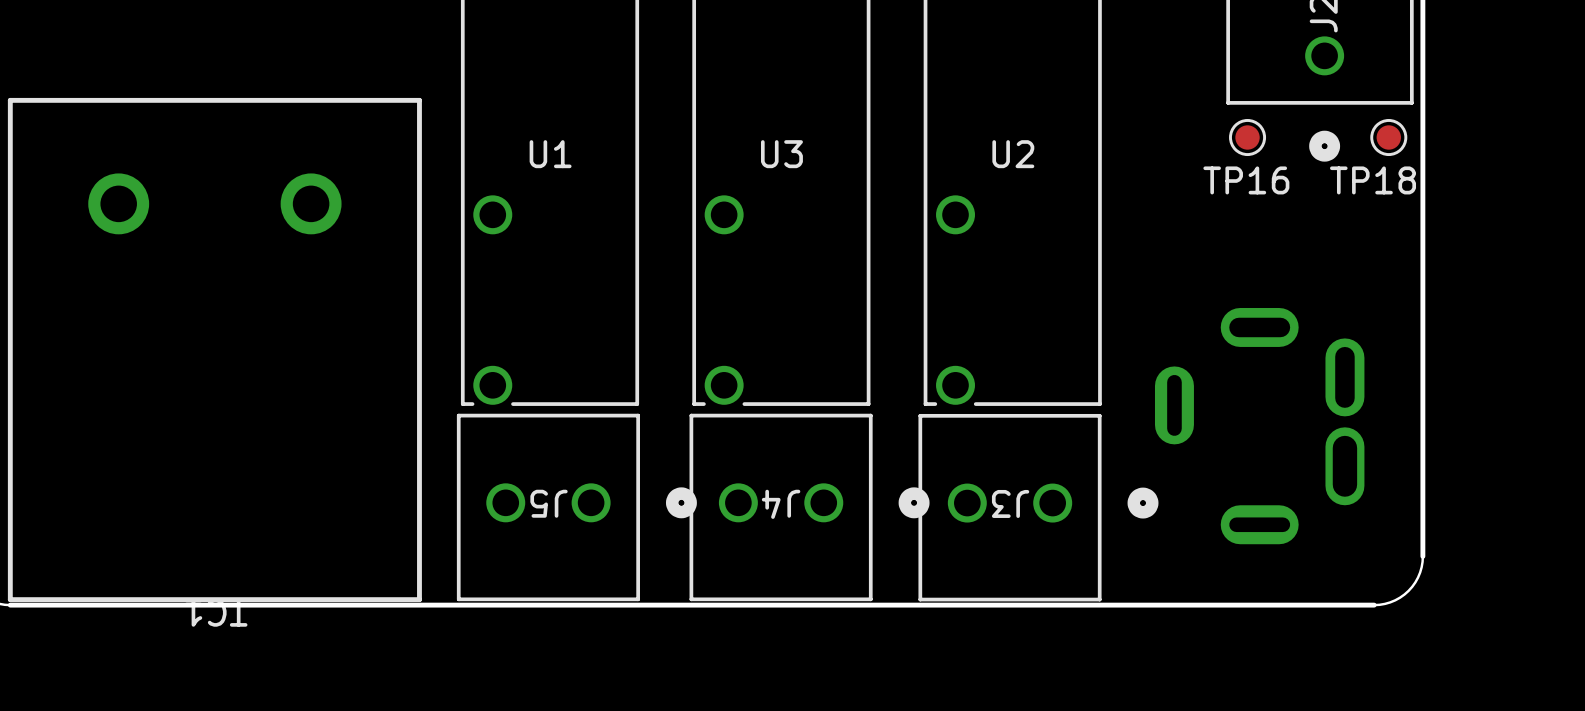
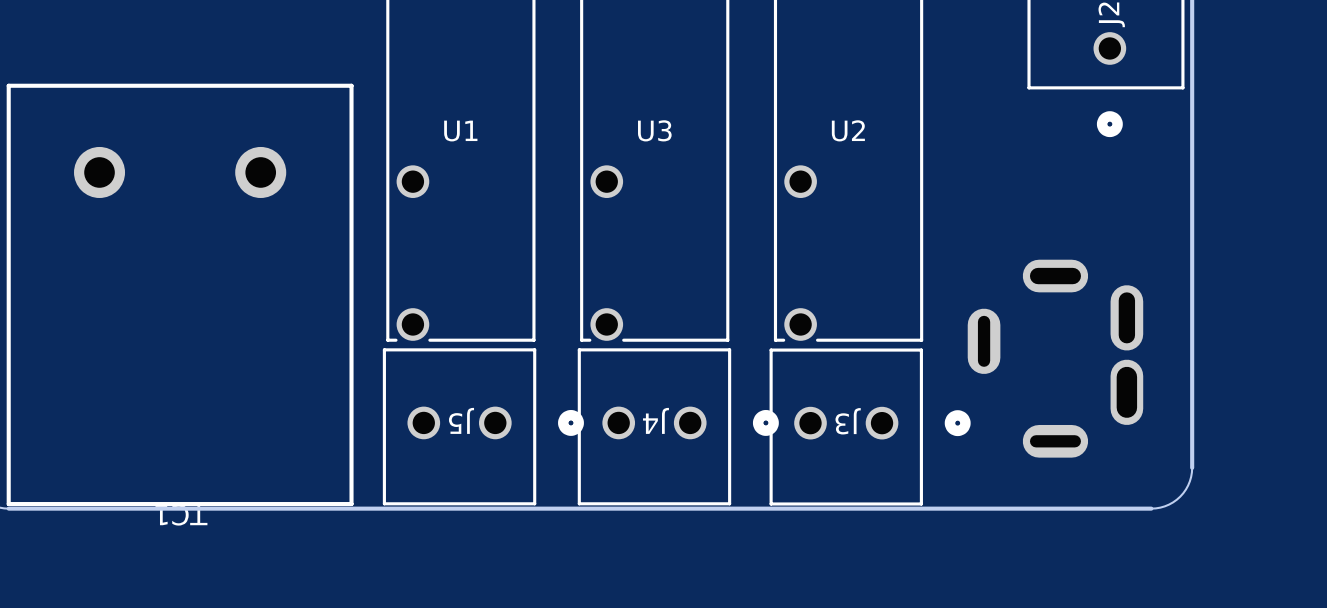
TP16: (1247, 137) -> none
TP18: (1388, 137) -> none

